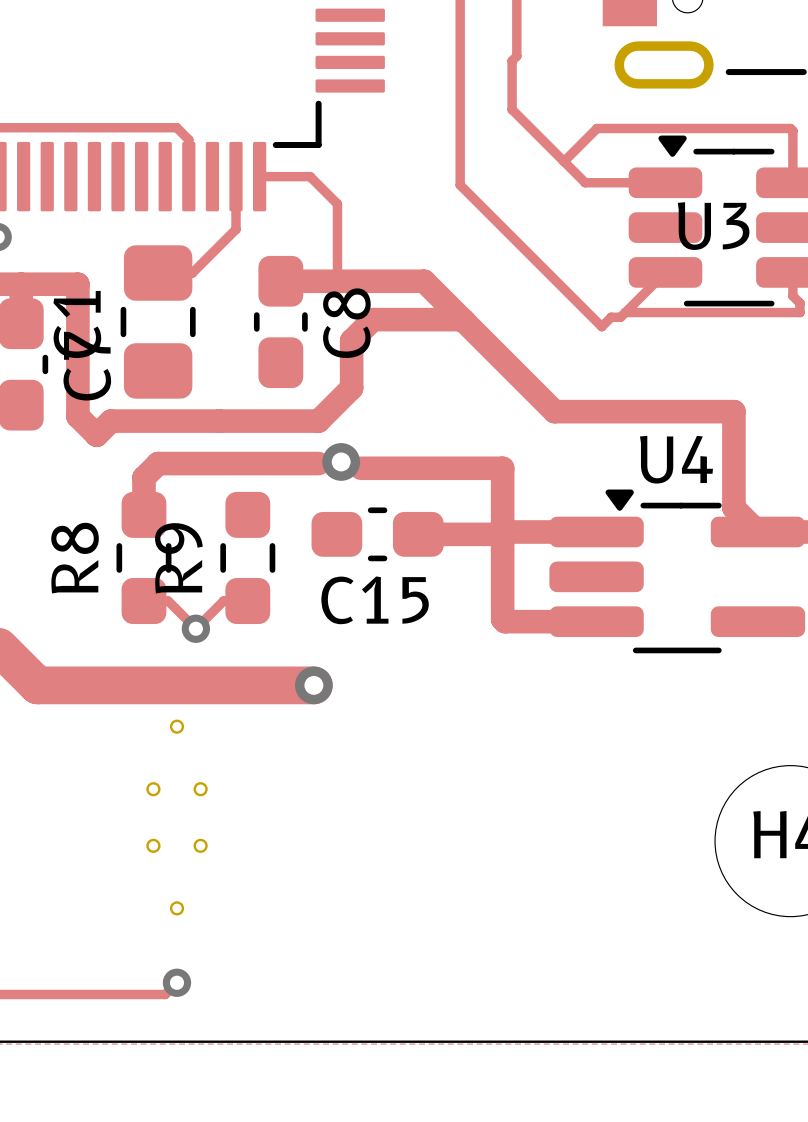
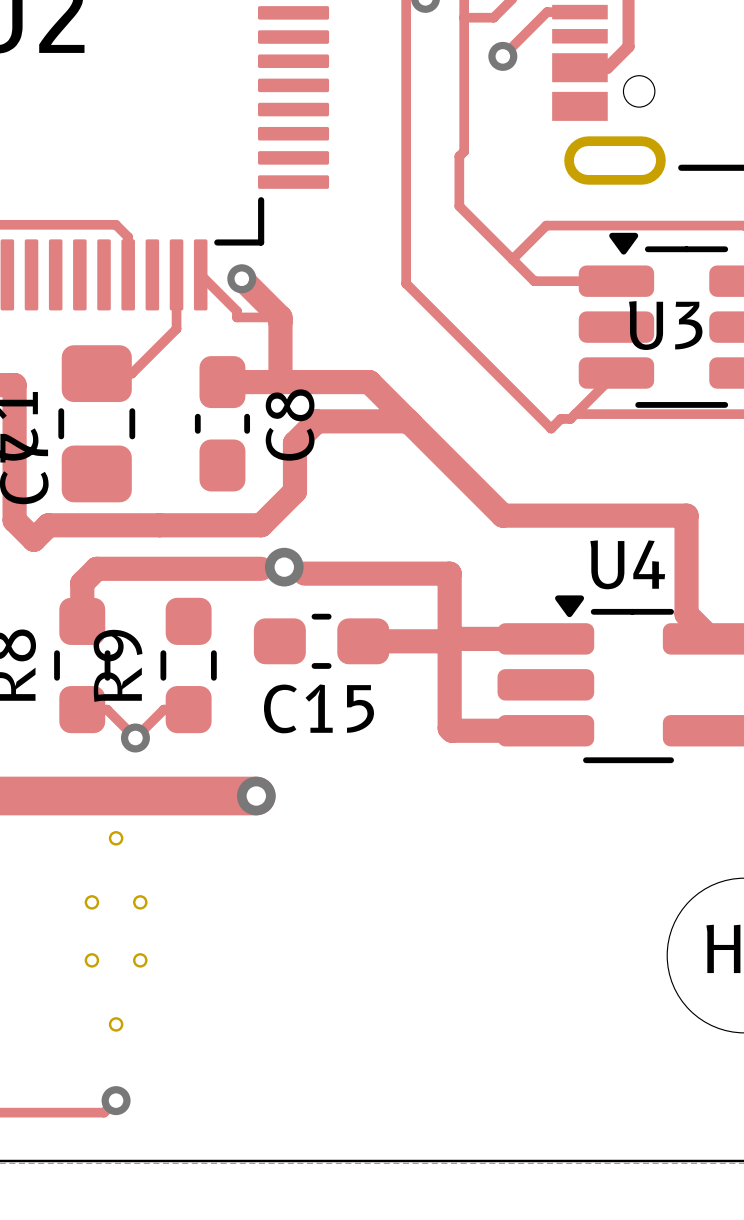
track: (259, 176) (310, 176) (337, 203) (337, 218) -> (200, 274) (236, 311) (236, 317) (275, 317) (280, 322)
track: none -> (241, 278) (280, 317)
via: none -> (241, 278)
track width: thin (337, 218) (337, 281) -> thick (280, 317) (280, 382)

